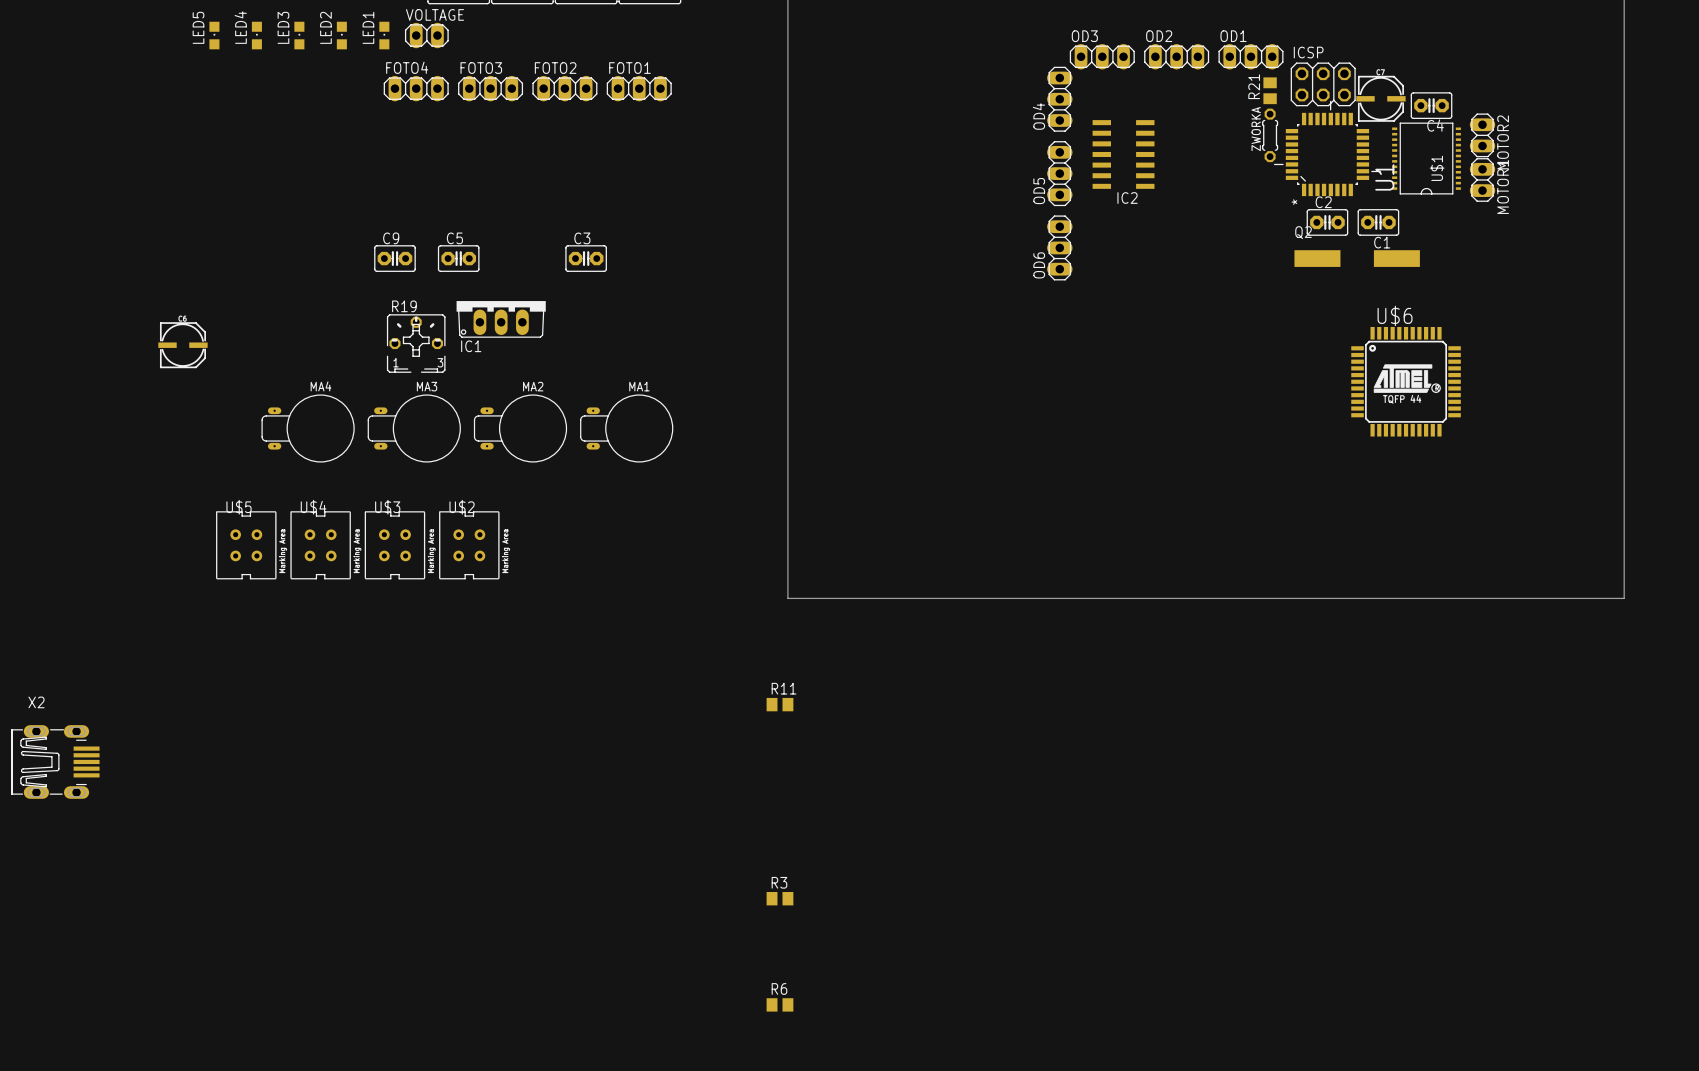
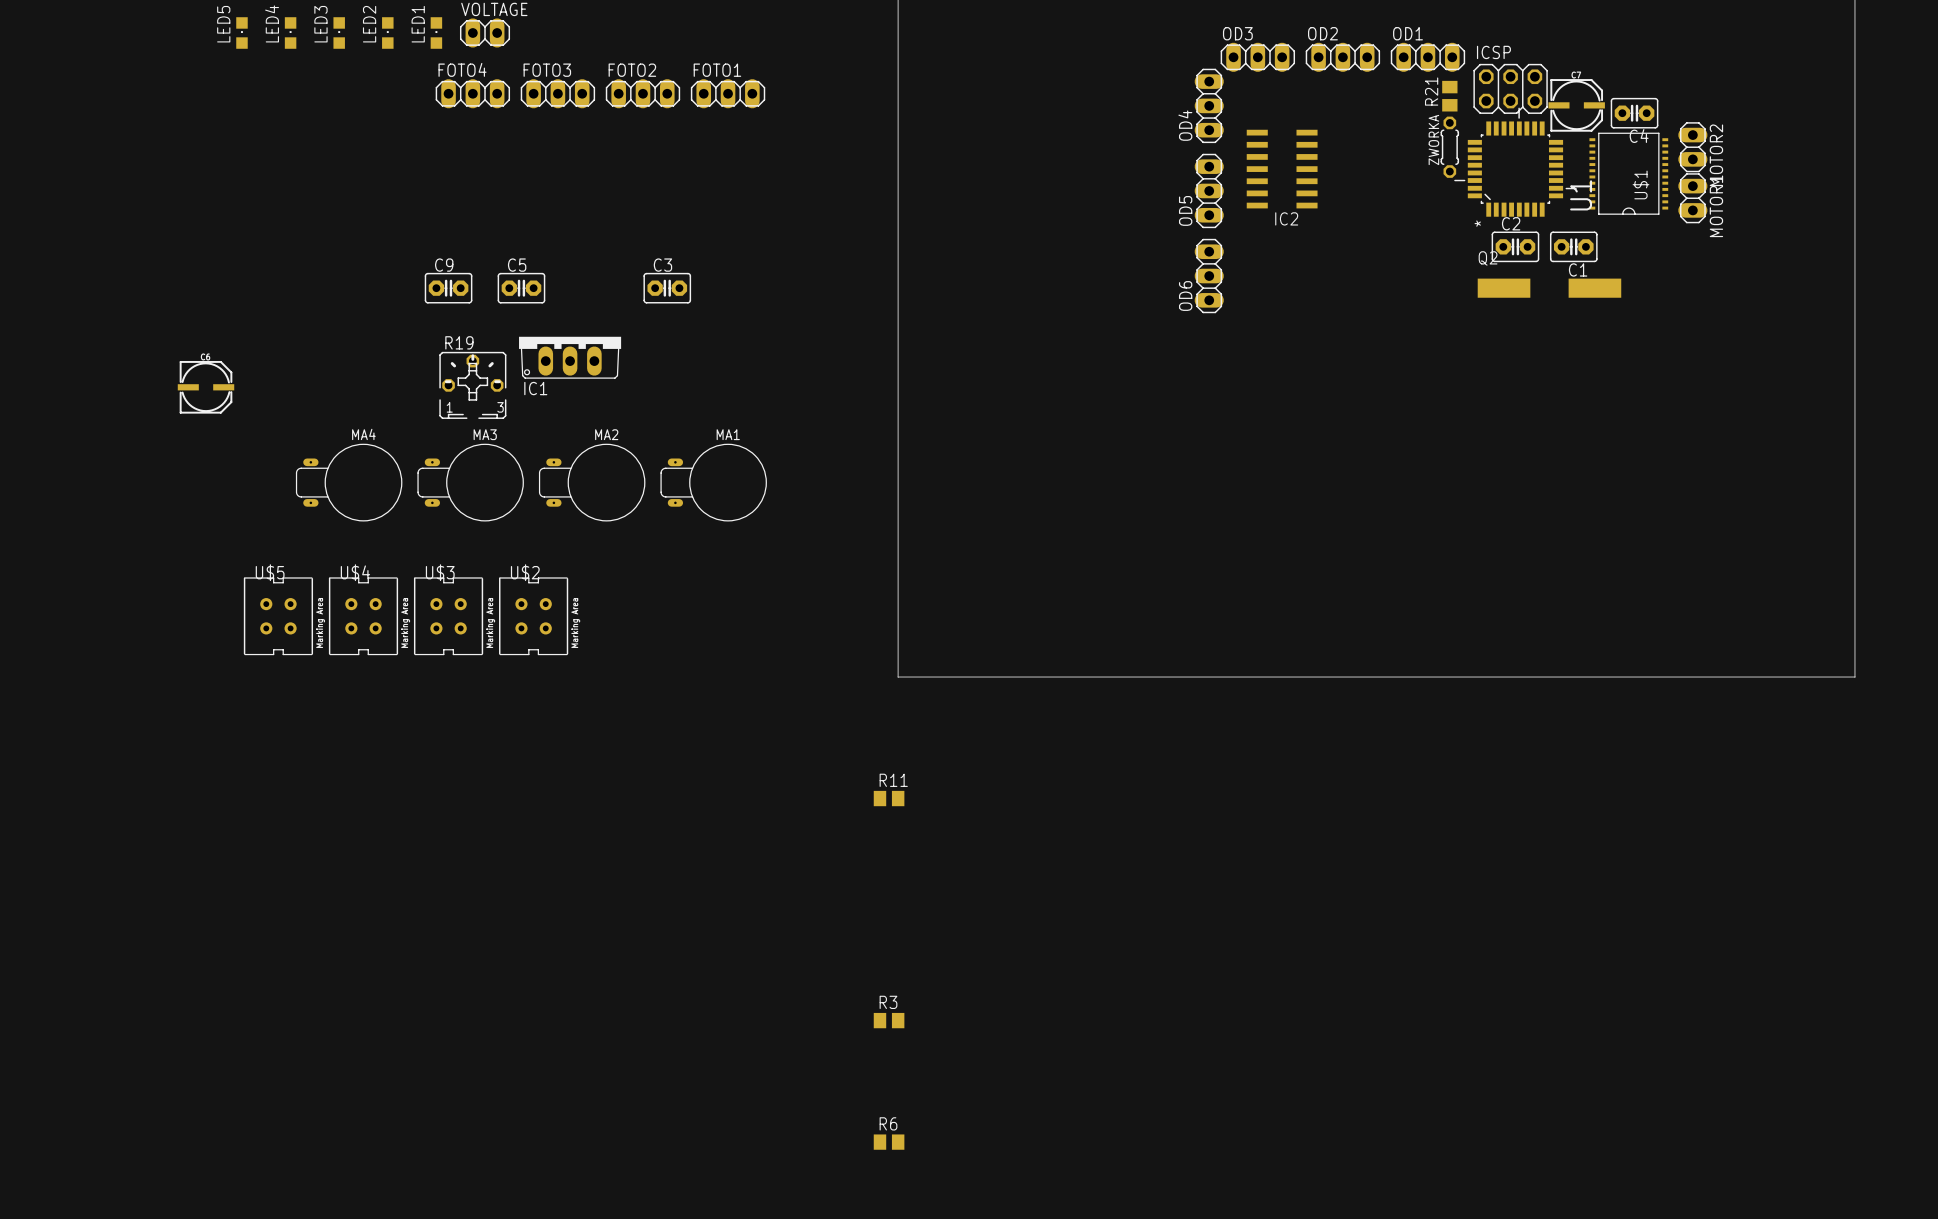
U$6: (1406, 381) -> none
X2: (55, 761) -> none

